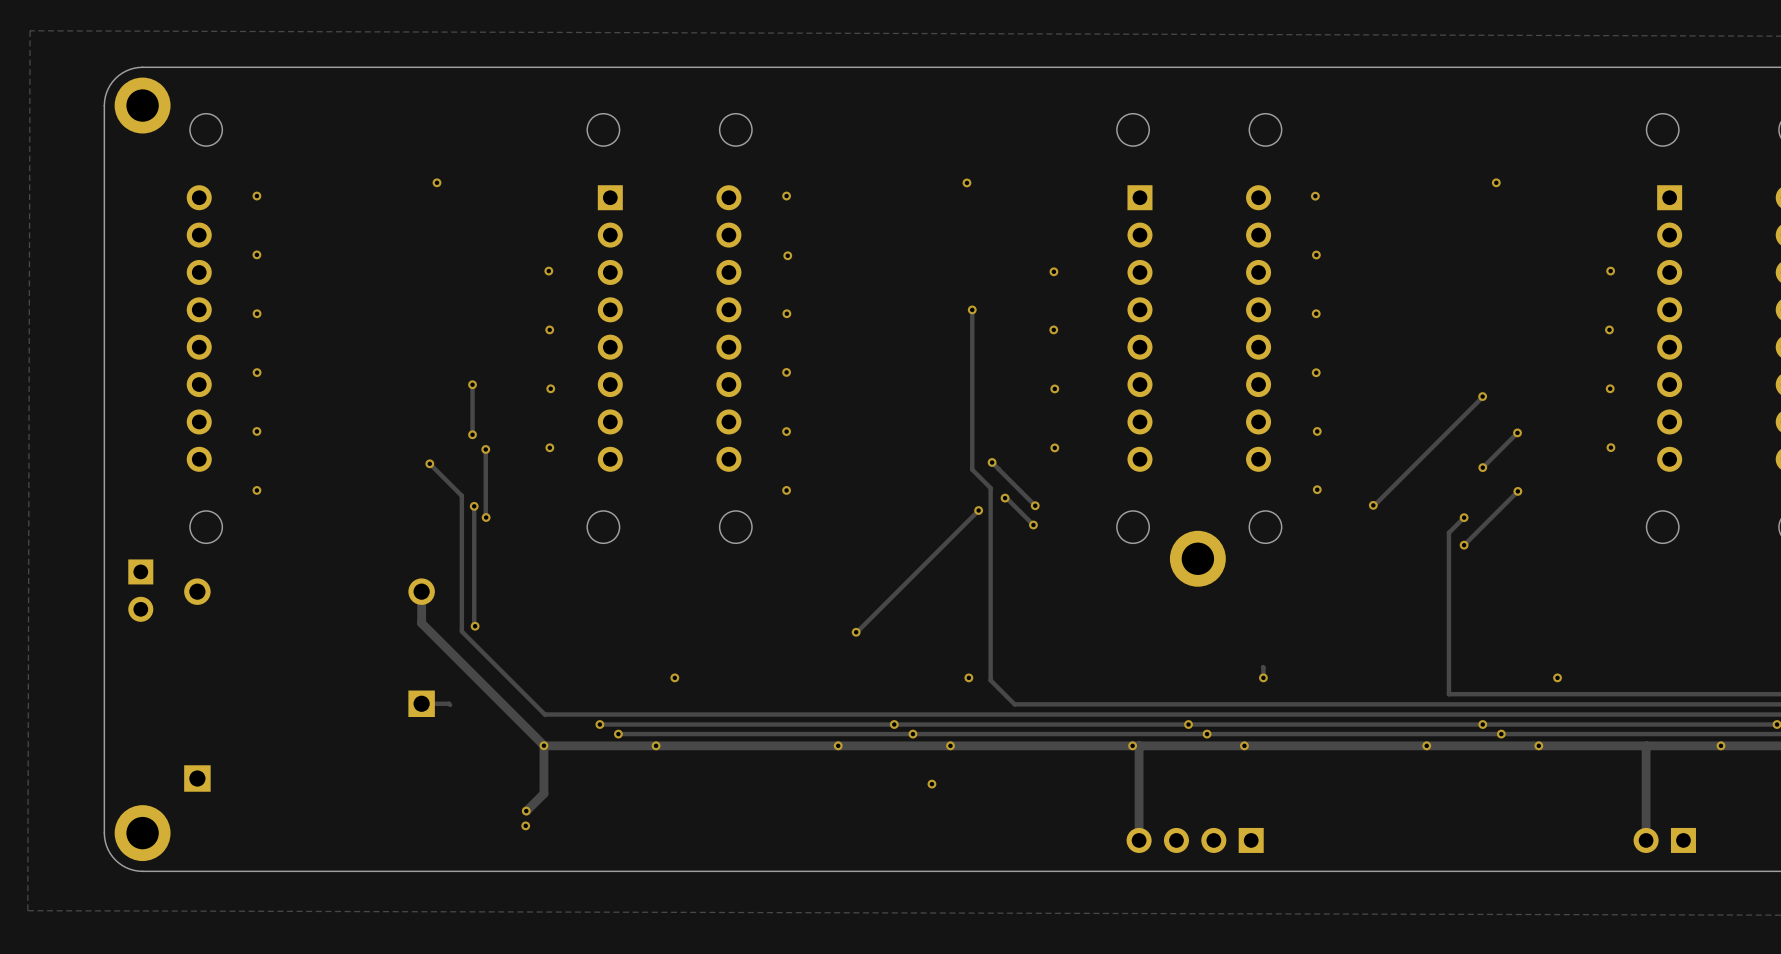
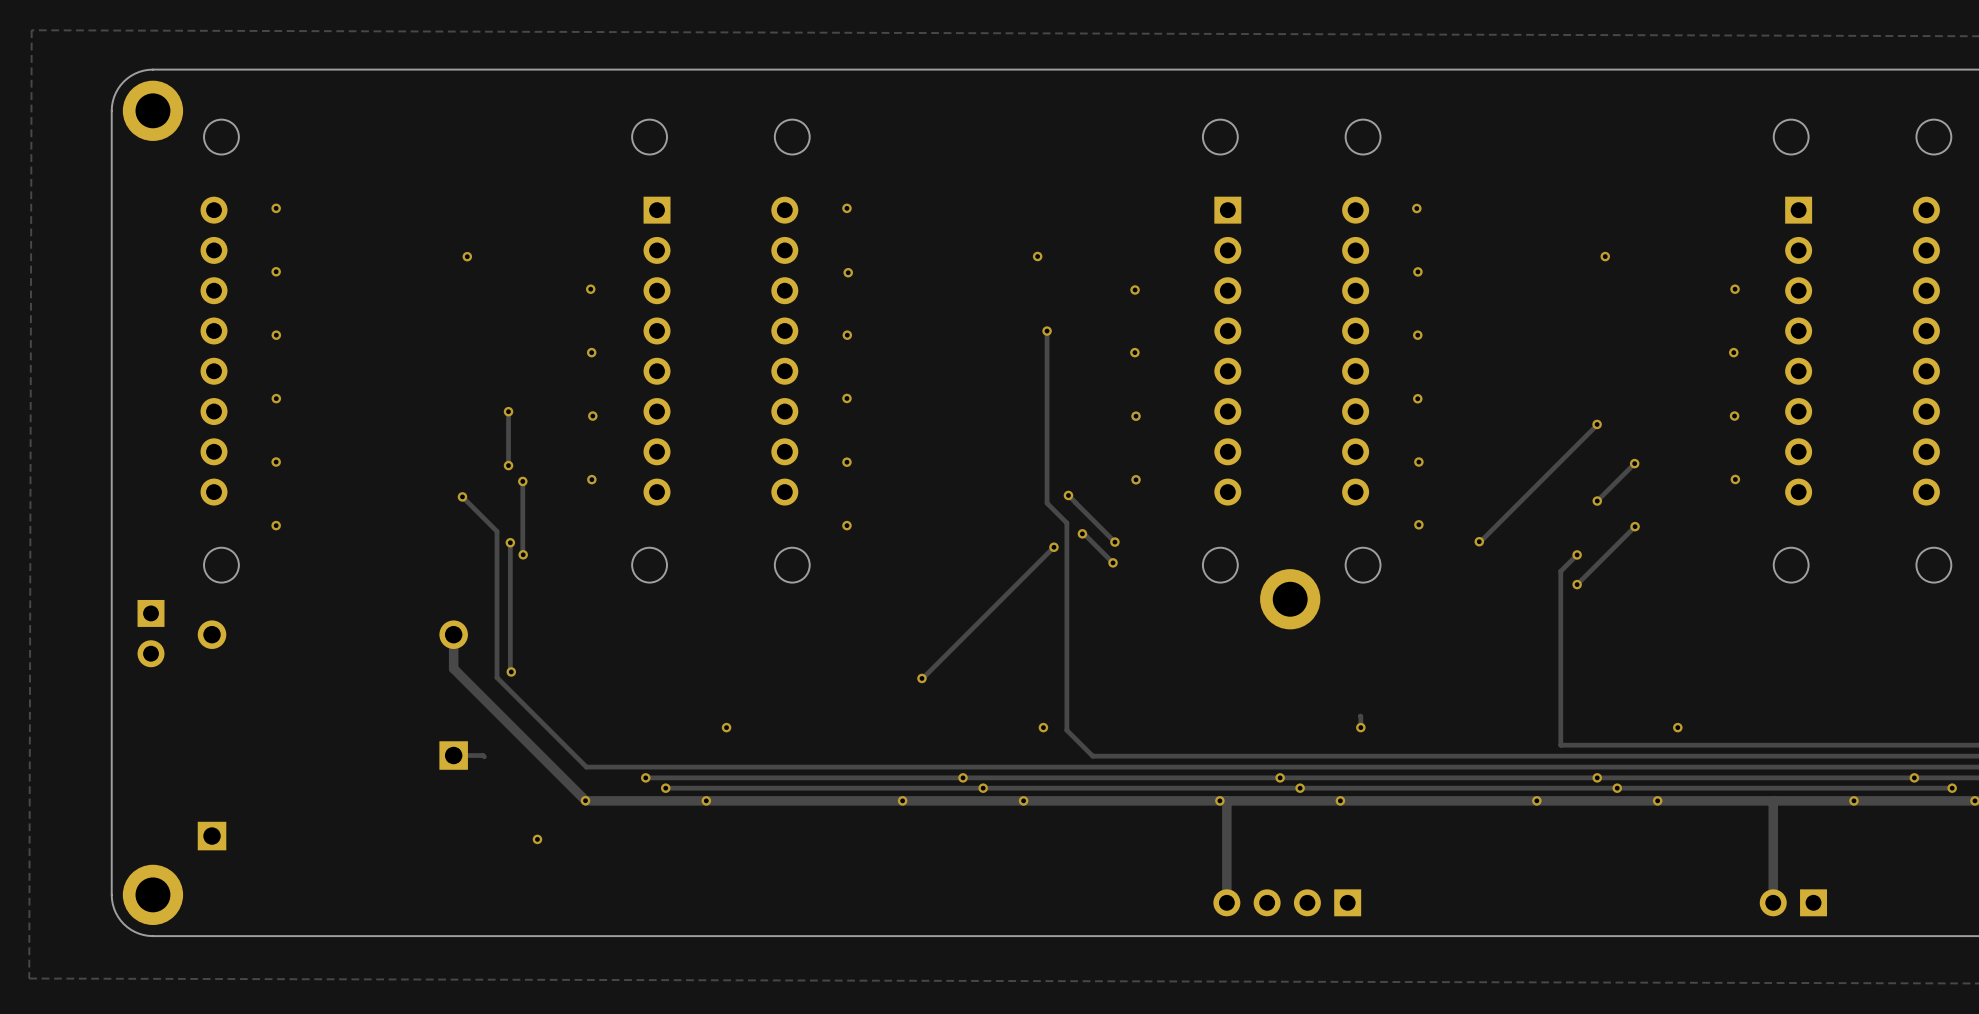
via position: (437, 182) -> (467, 256)
via position: (966, 182) -> (1037, 256)
via position: (1496, 182) -> (1605, 256)
track: (543, 745) (543, 793) (526, 811) -> none
via: none -> (537, 839)
via: (931, 784) -> none
via: (526, 811) -> none
via: (525, 825) -> none

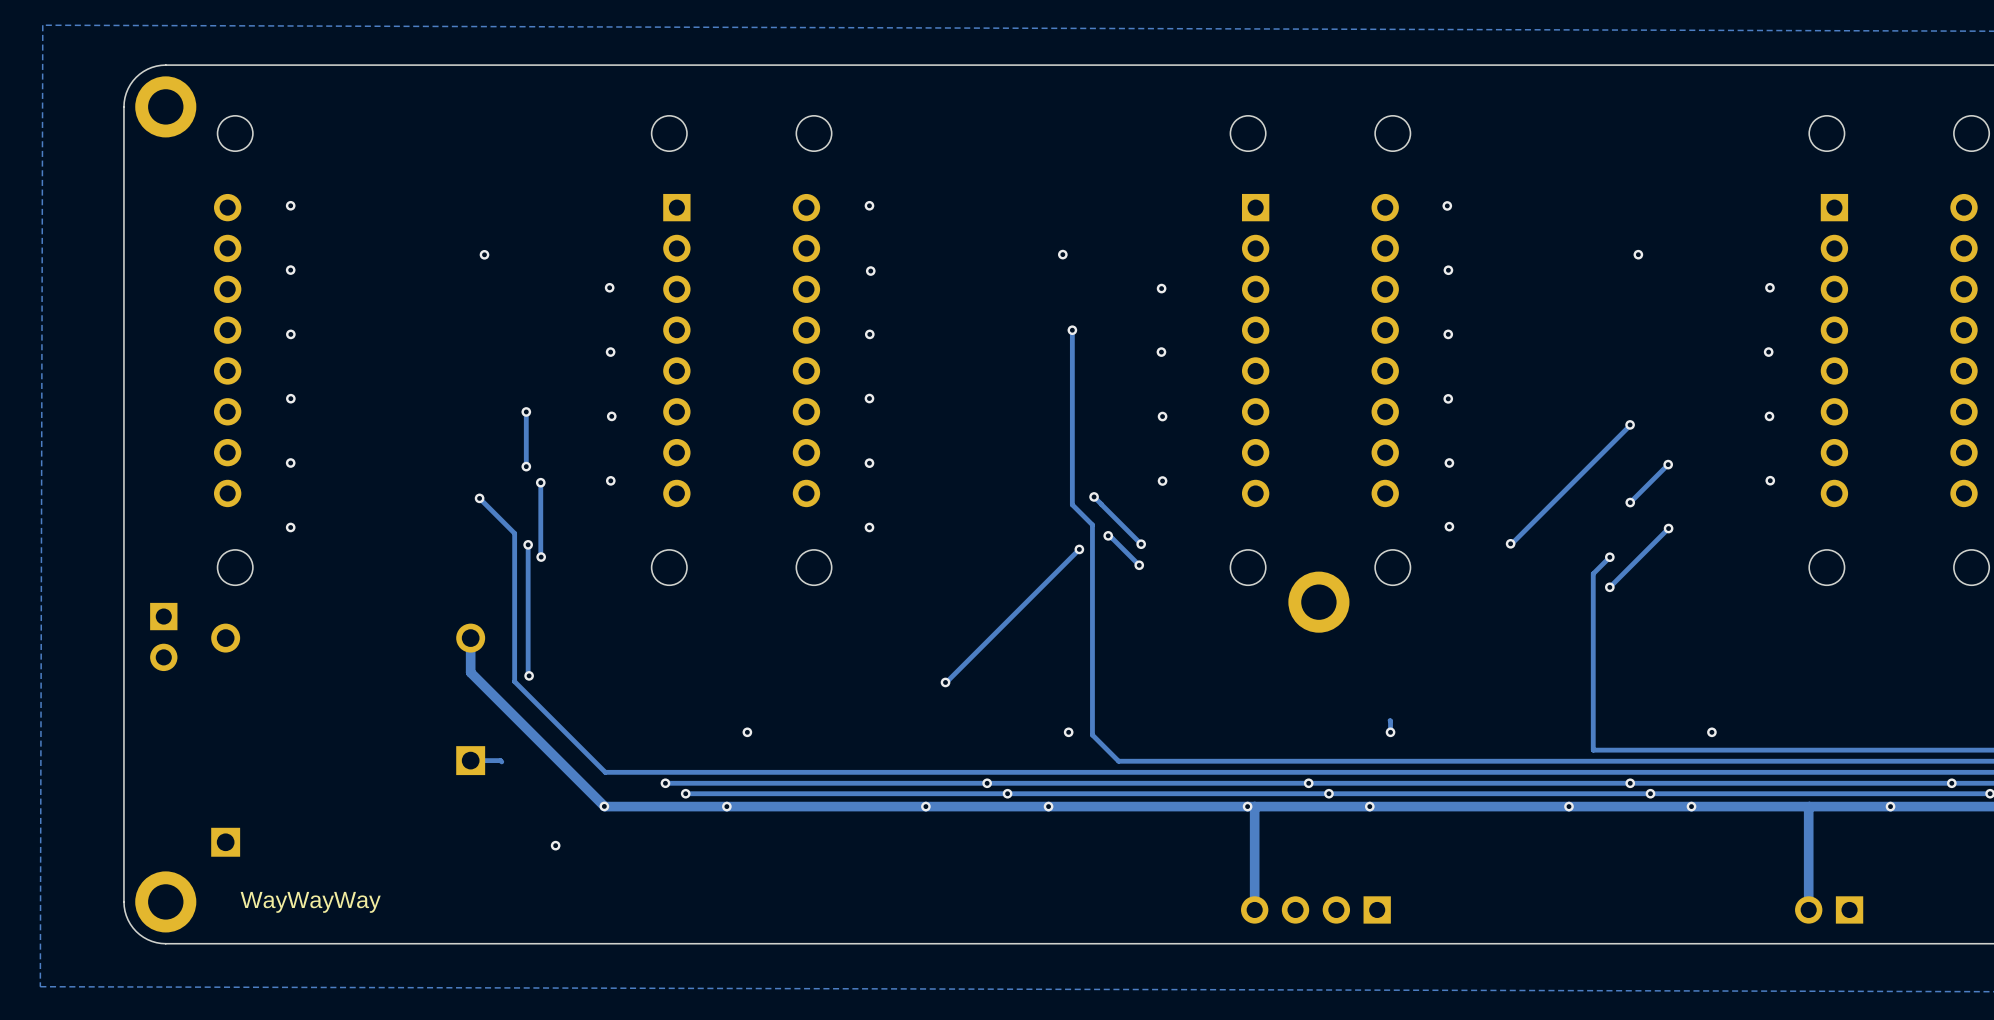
text: none -> WayWayWay (310, 902)

